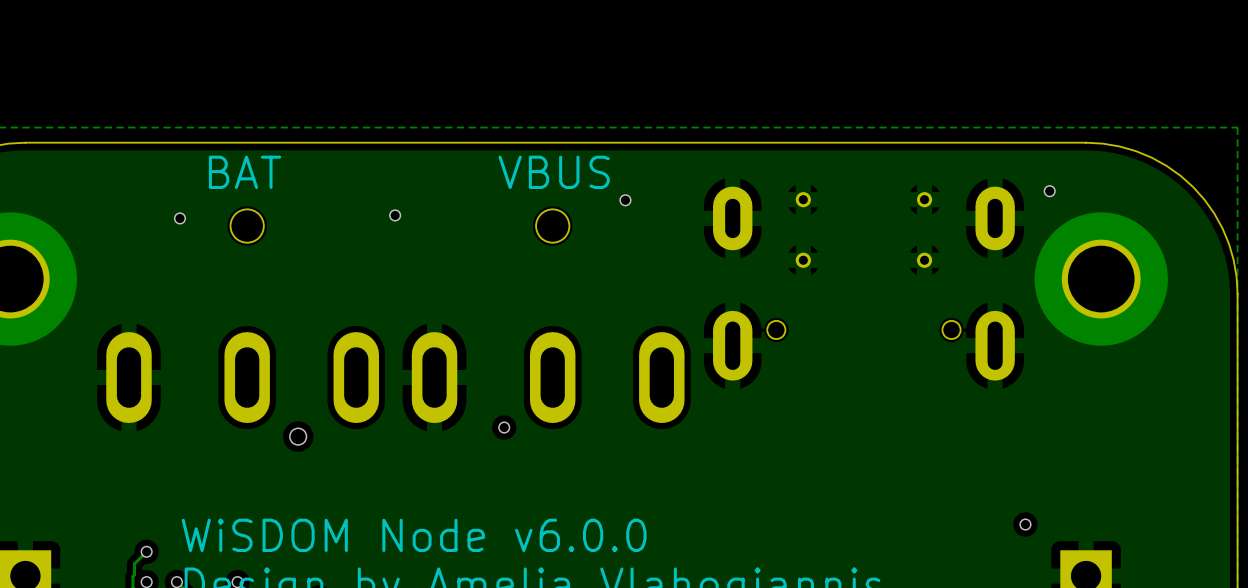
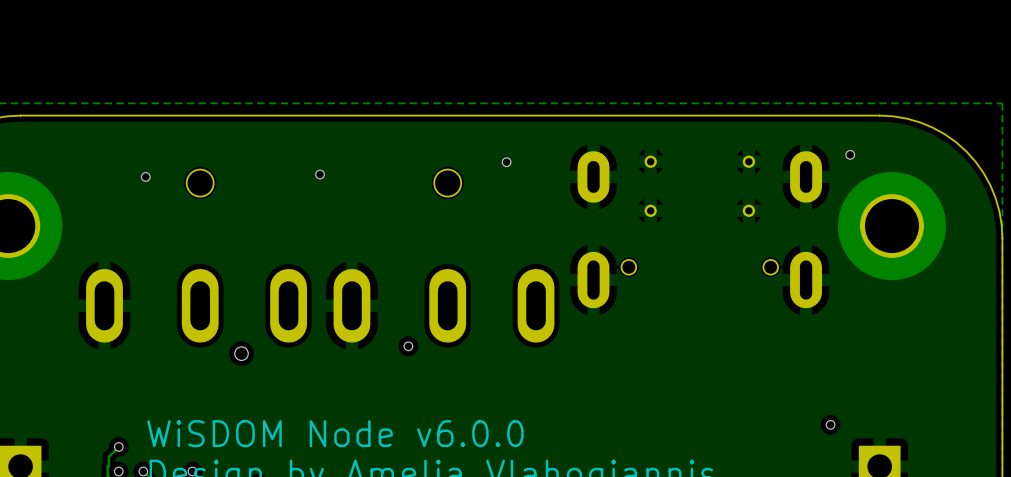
text: BAT (245, 172) -> none
text: VBUS (554, 172) -> none

